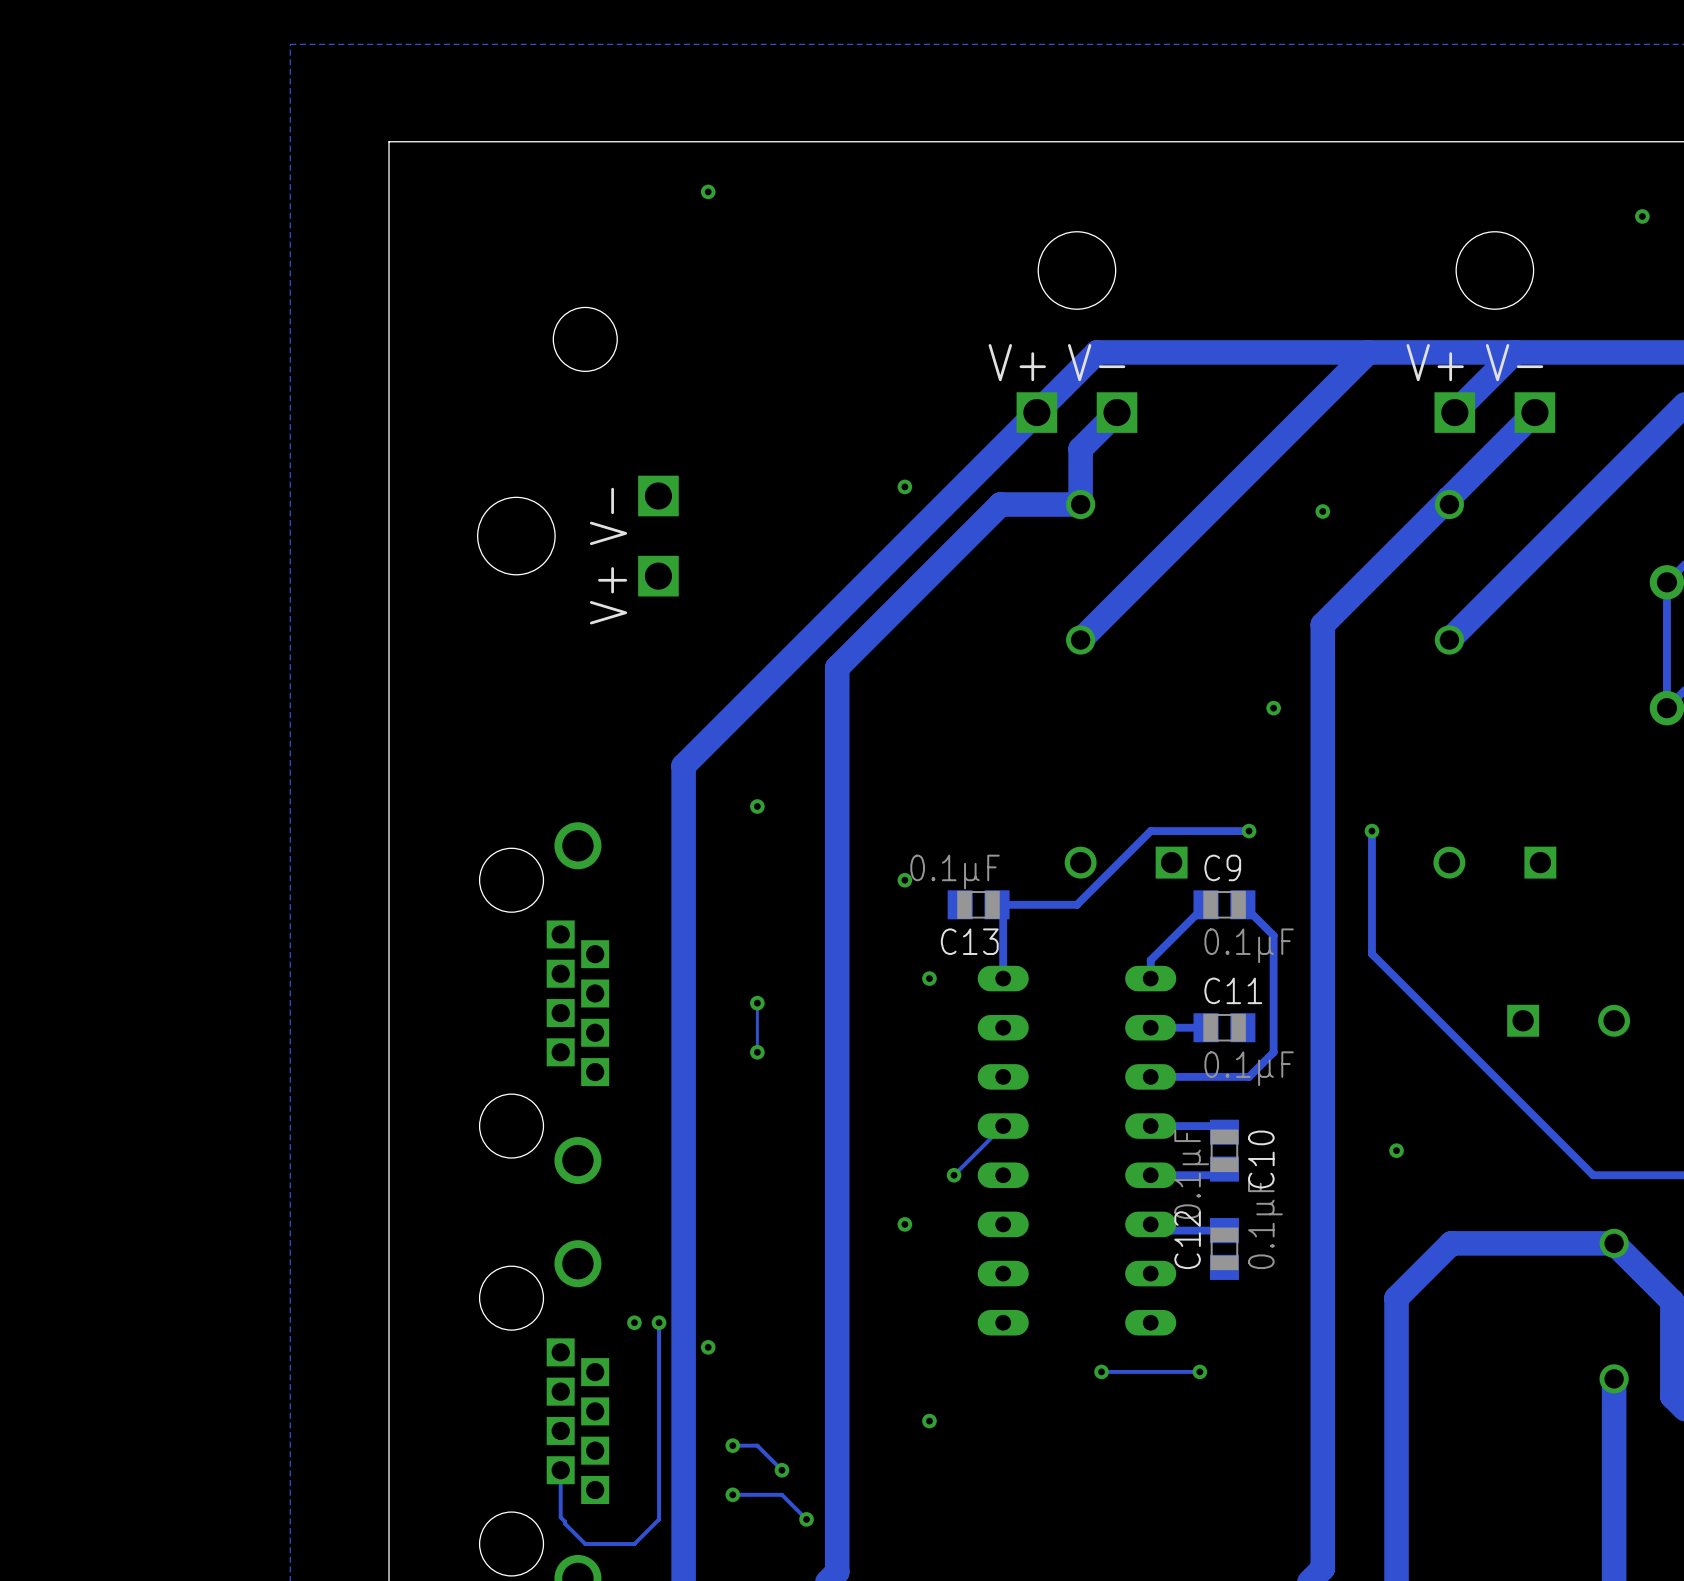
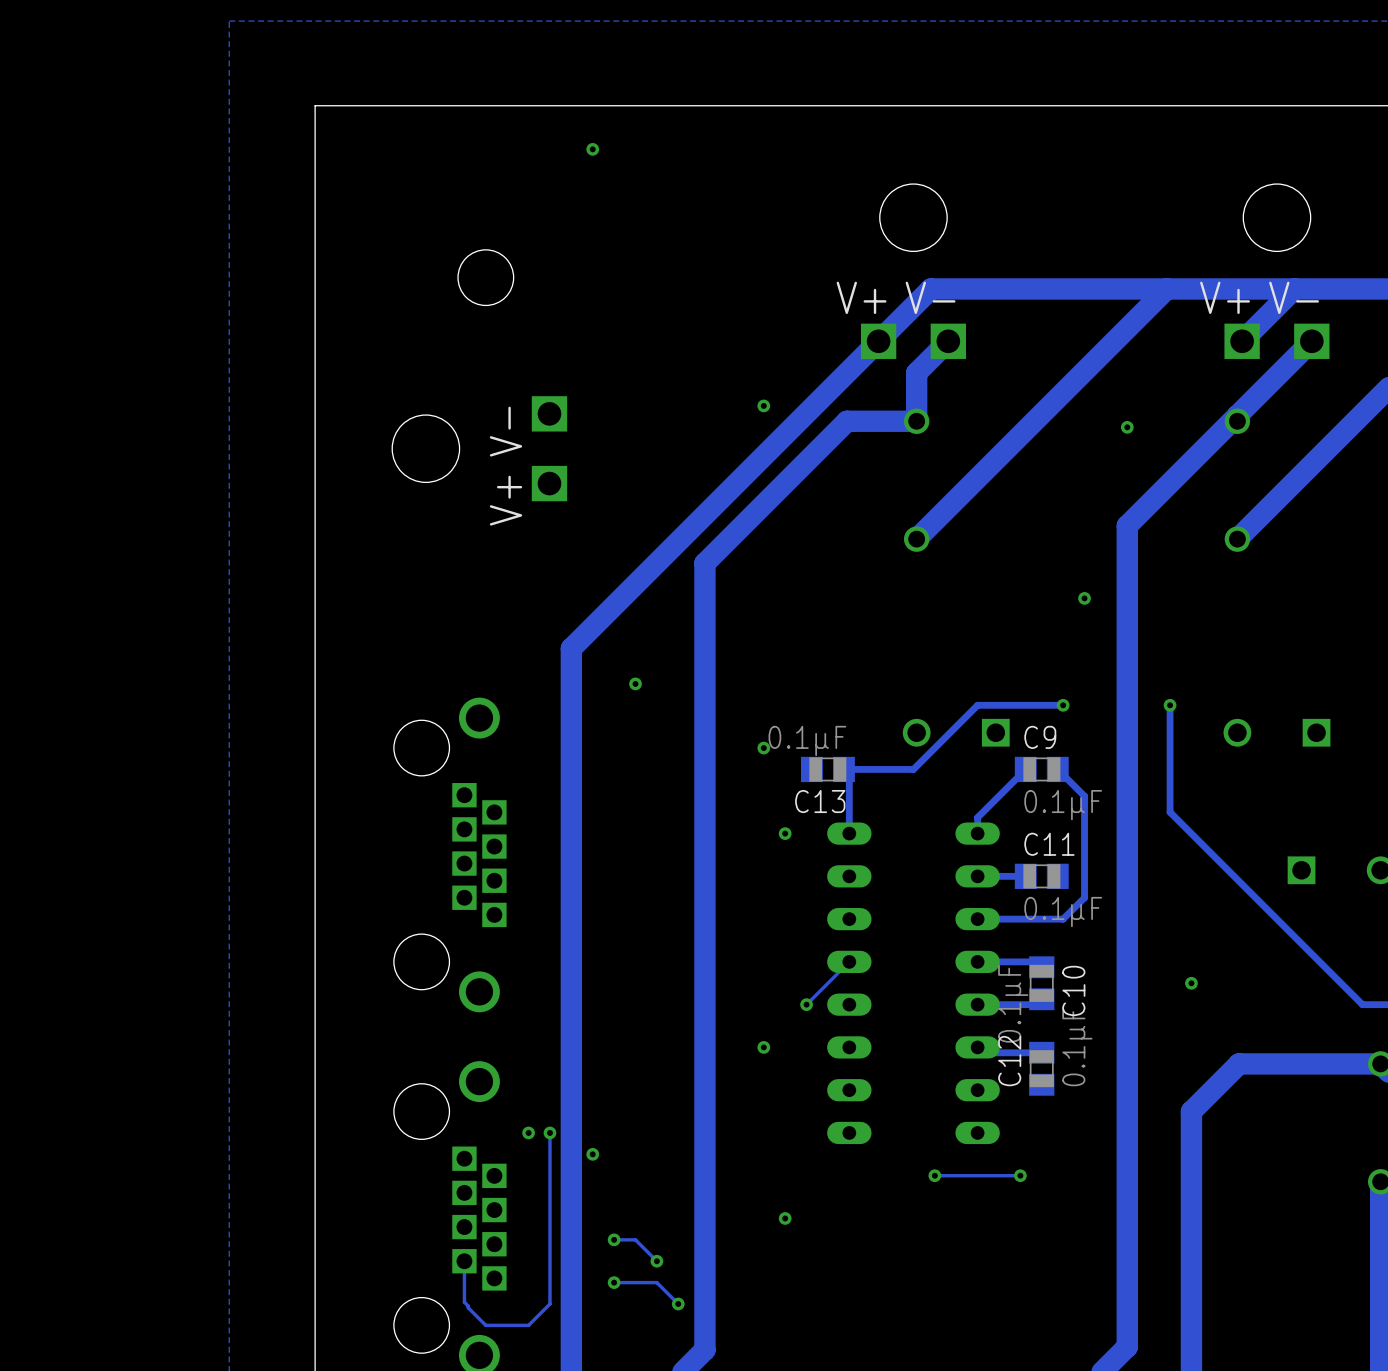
track: (757, 1003) (757, 1052) -> none
via: (757, 1003) -> none
via: (757, 1052) -> none

